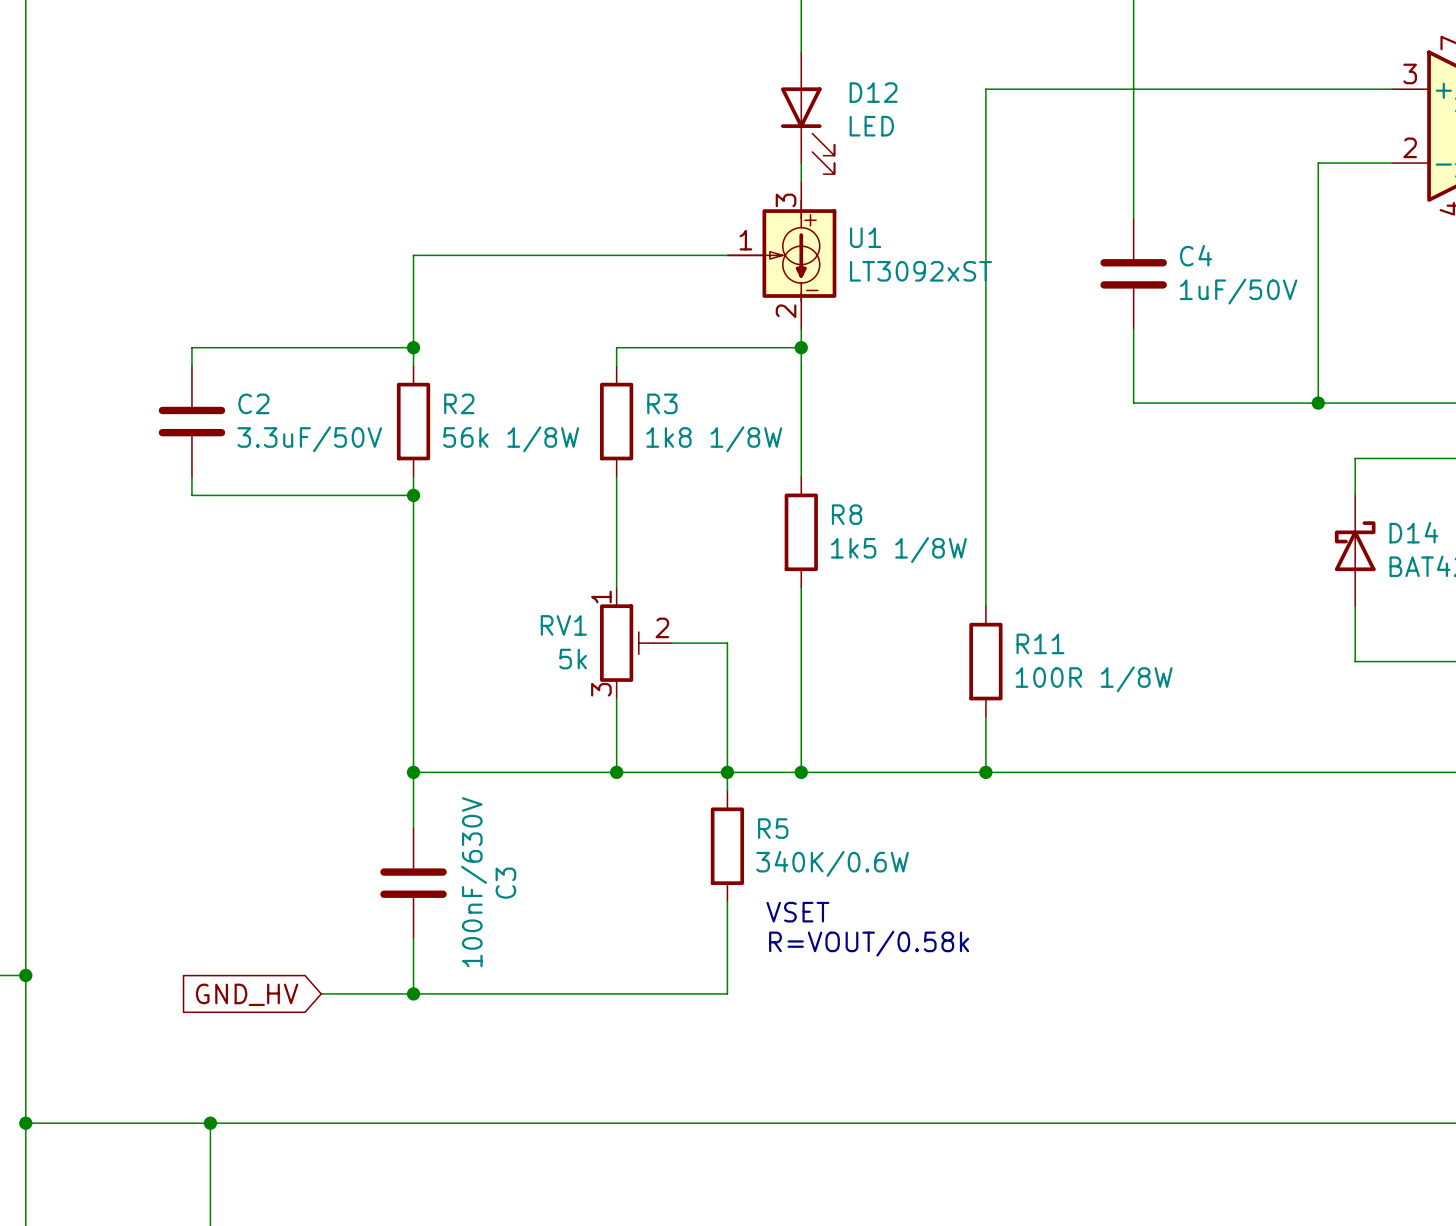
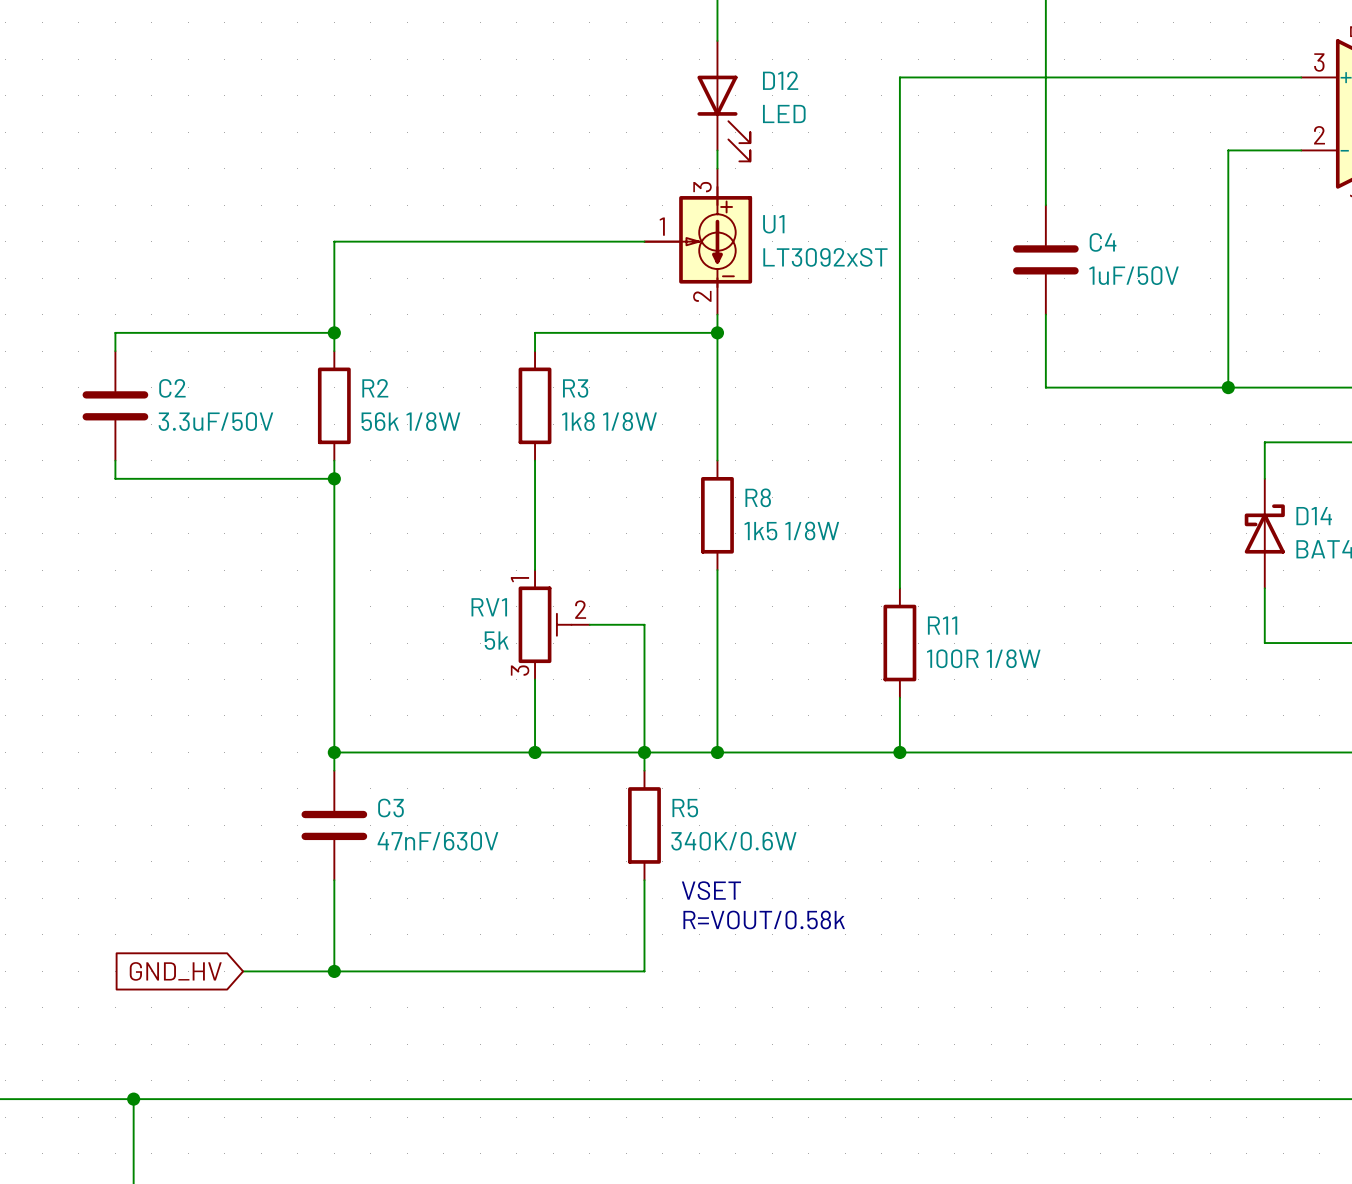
C3 value: 100nF/630V (474, 882) -> 47nF/630V (437, 841)
C3 position: (413, 883) -> (334, 825)
C3 name rotation: 0° (505, 883) -> 90° clockwise (391, 808)

